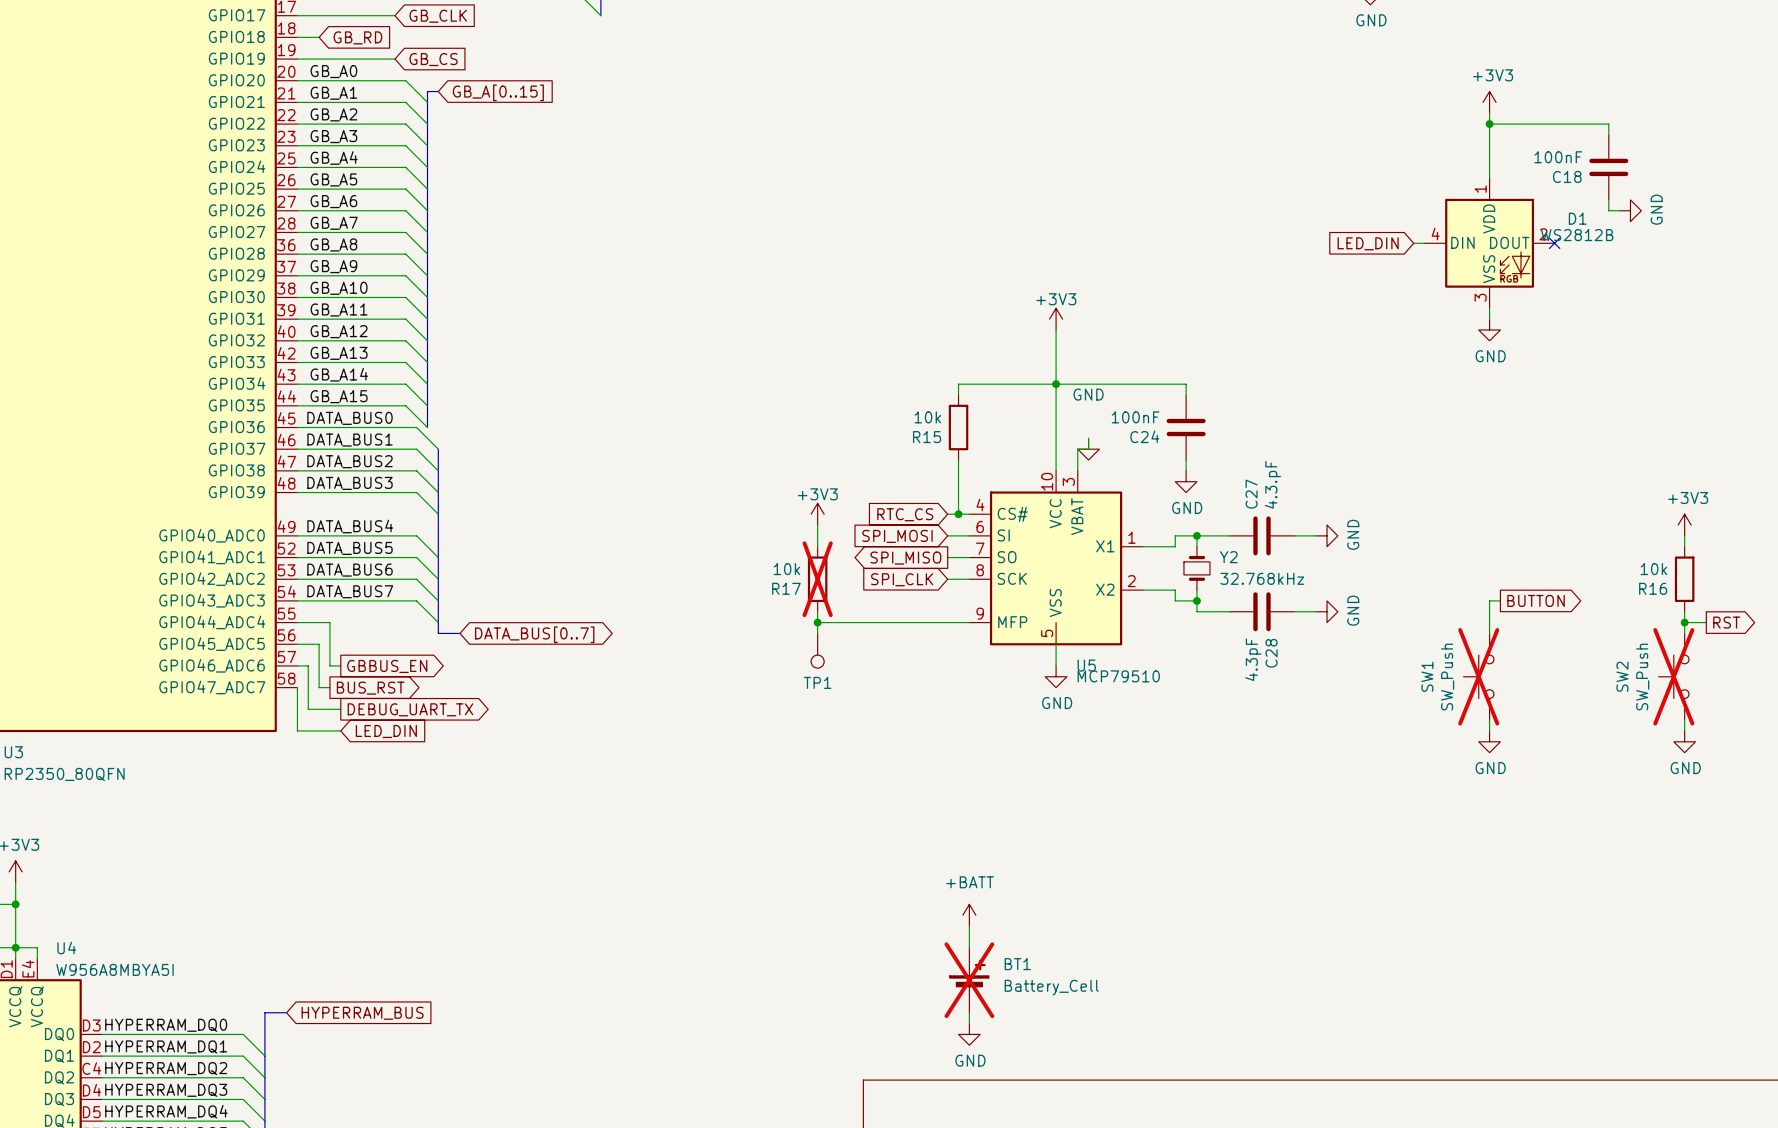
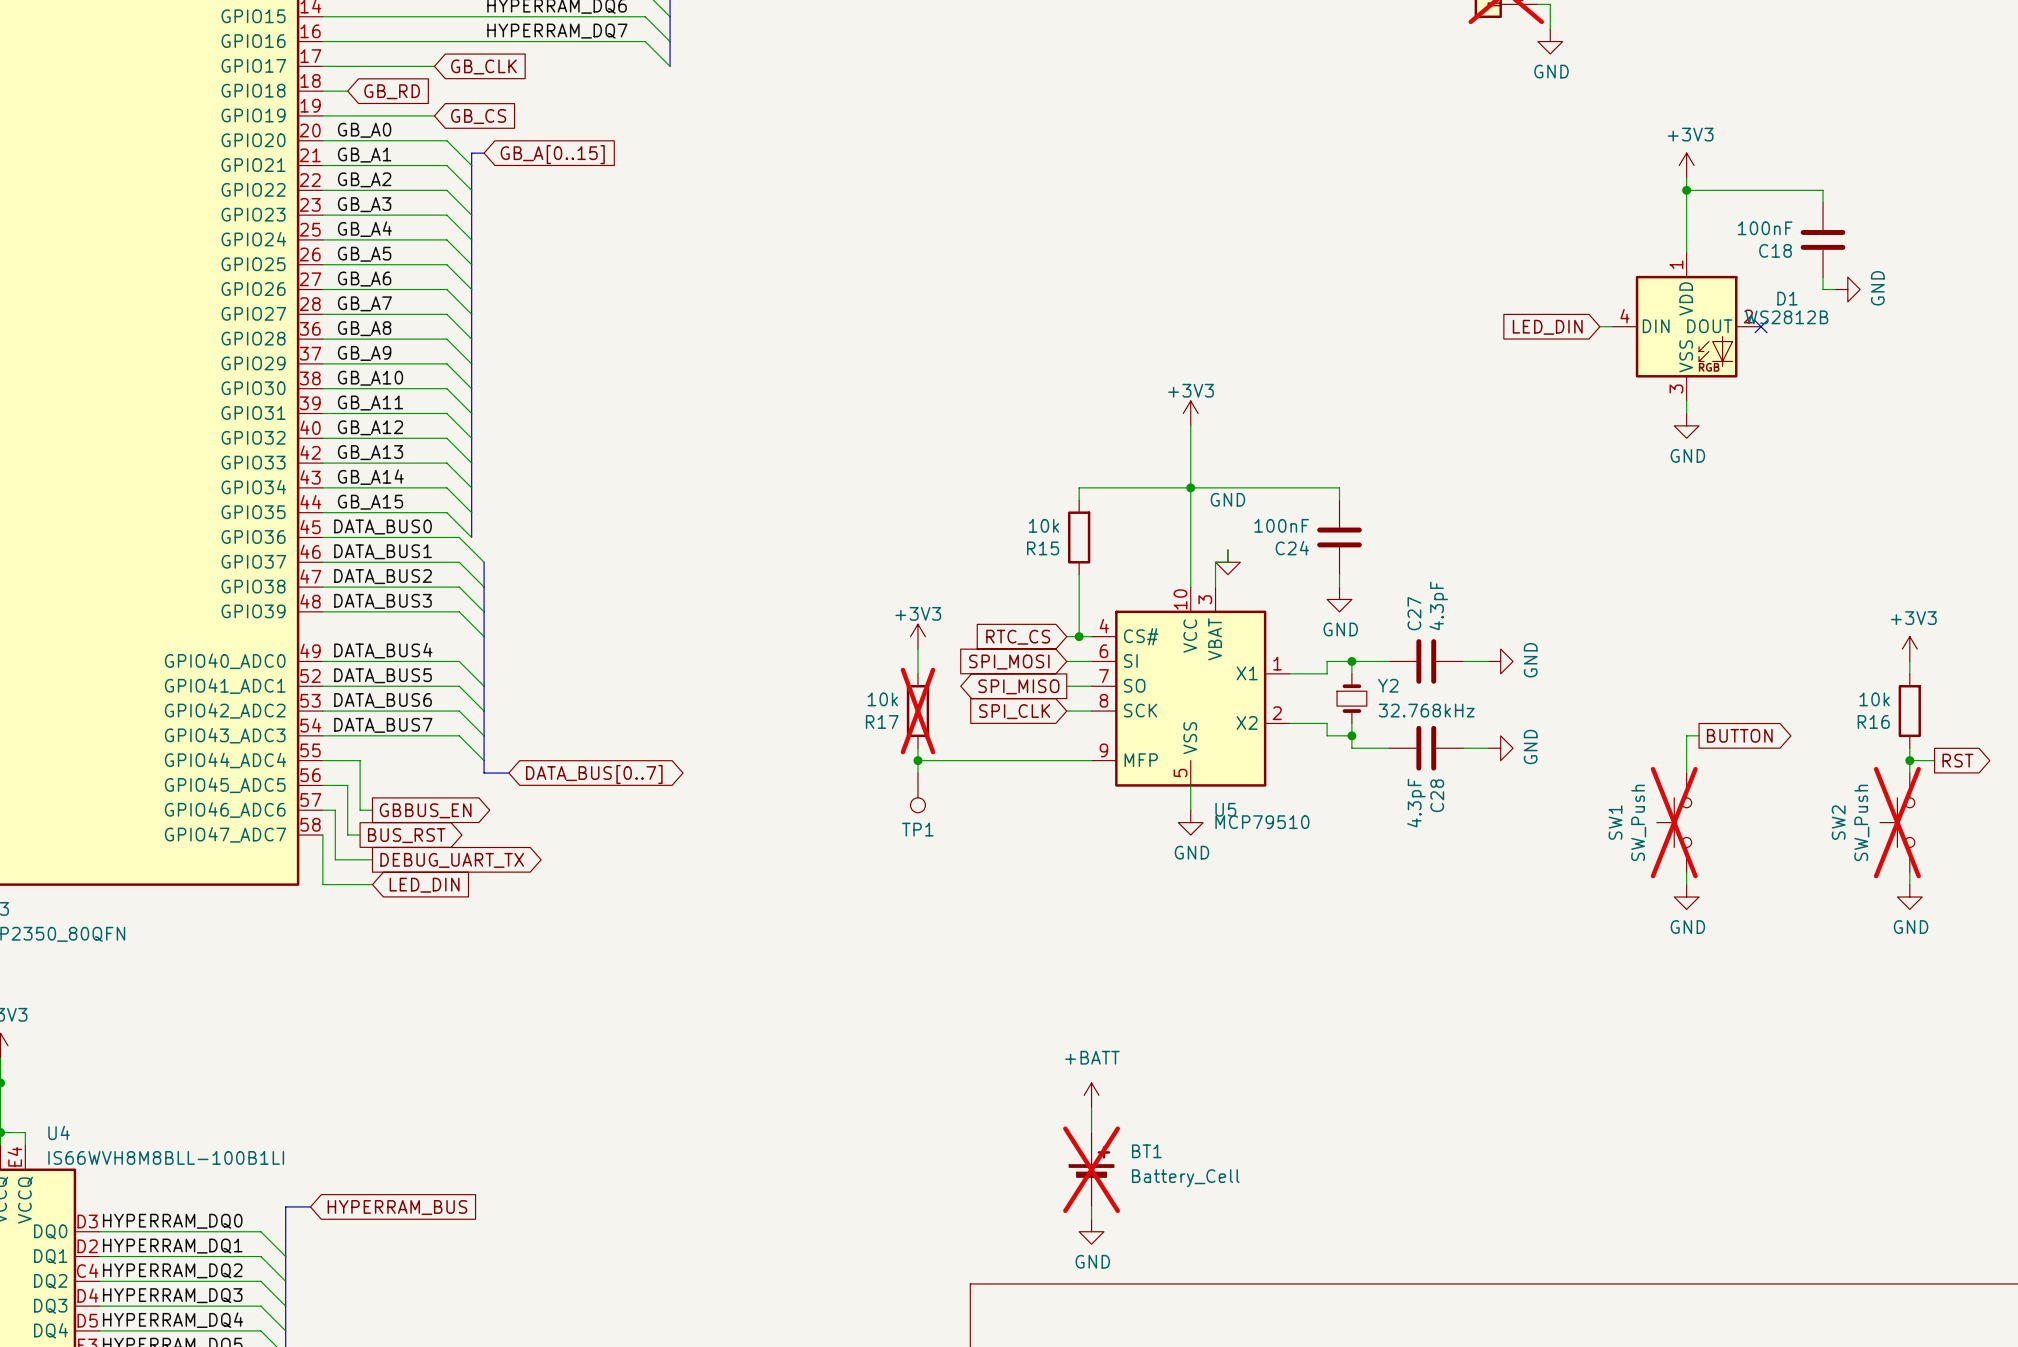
C27 value: 4.3.pF (1272, 484) -> 4.3pF (1438, 605)
U4 value: W956A8MBYA5I (115, 969) -> IS66WVH8M8BLL-100B1LI (166, 1157)

